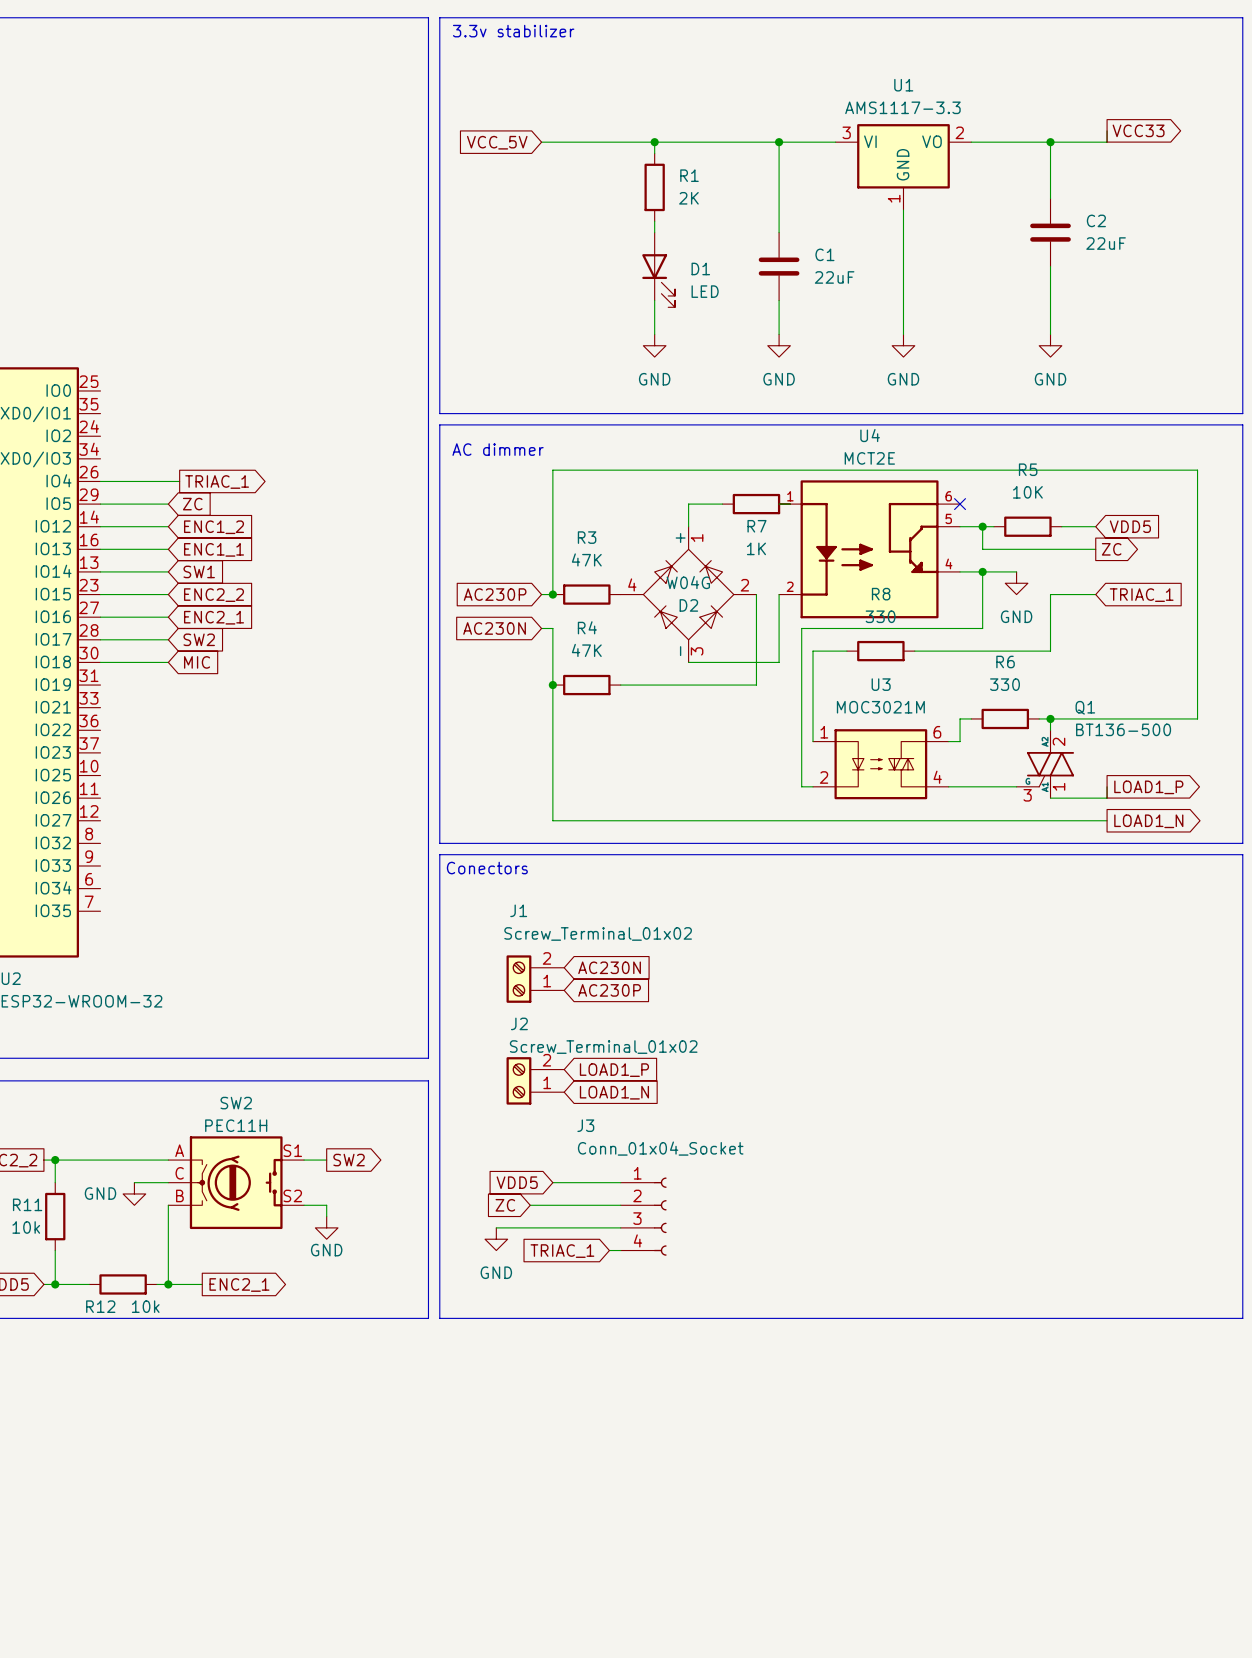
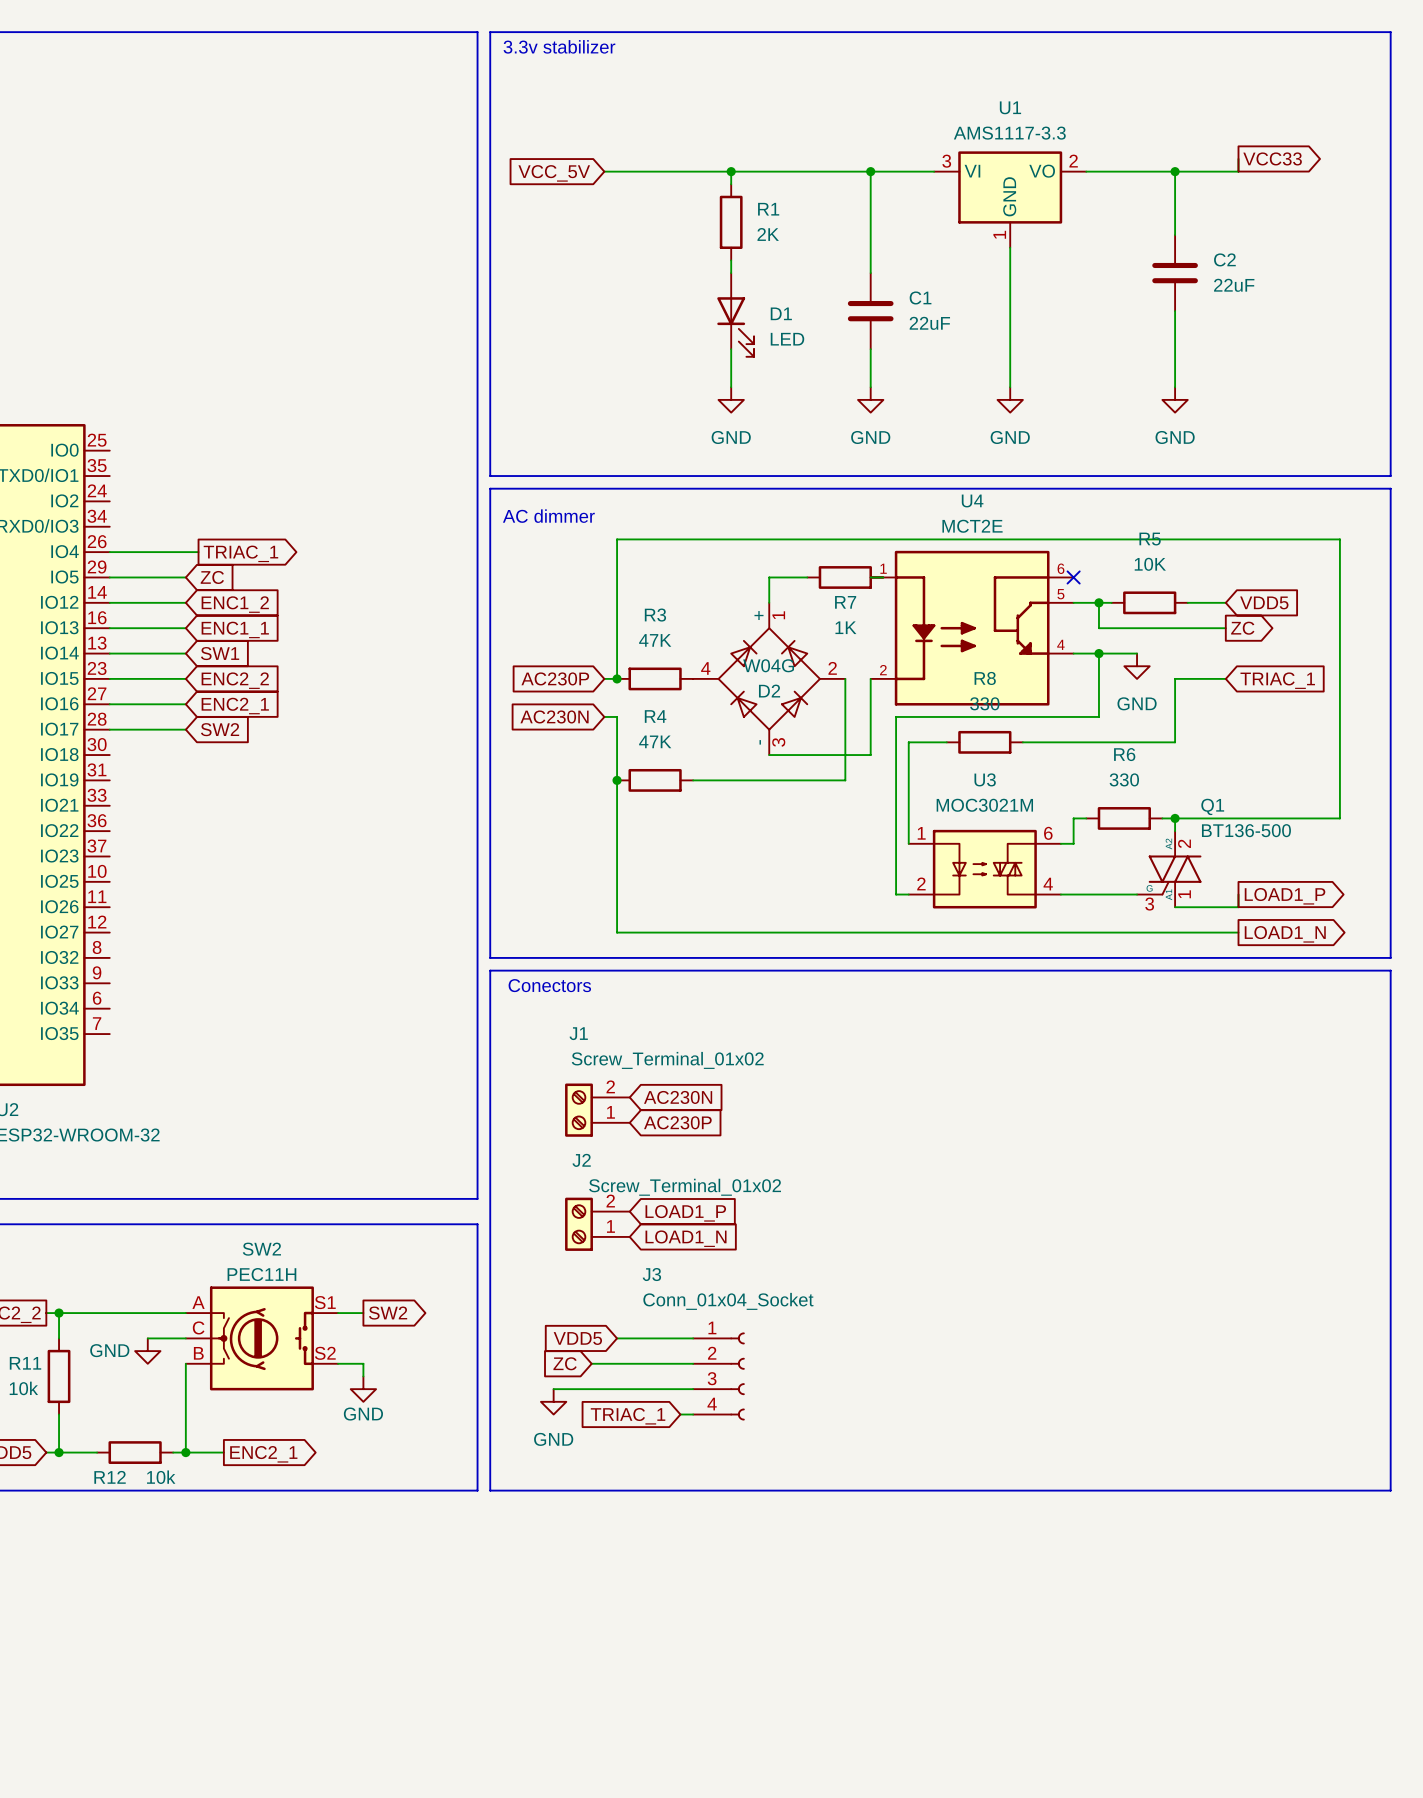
wire: (100, 662) (168, 662) -> none
global label: MIC (197, 662) -> none

